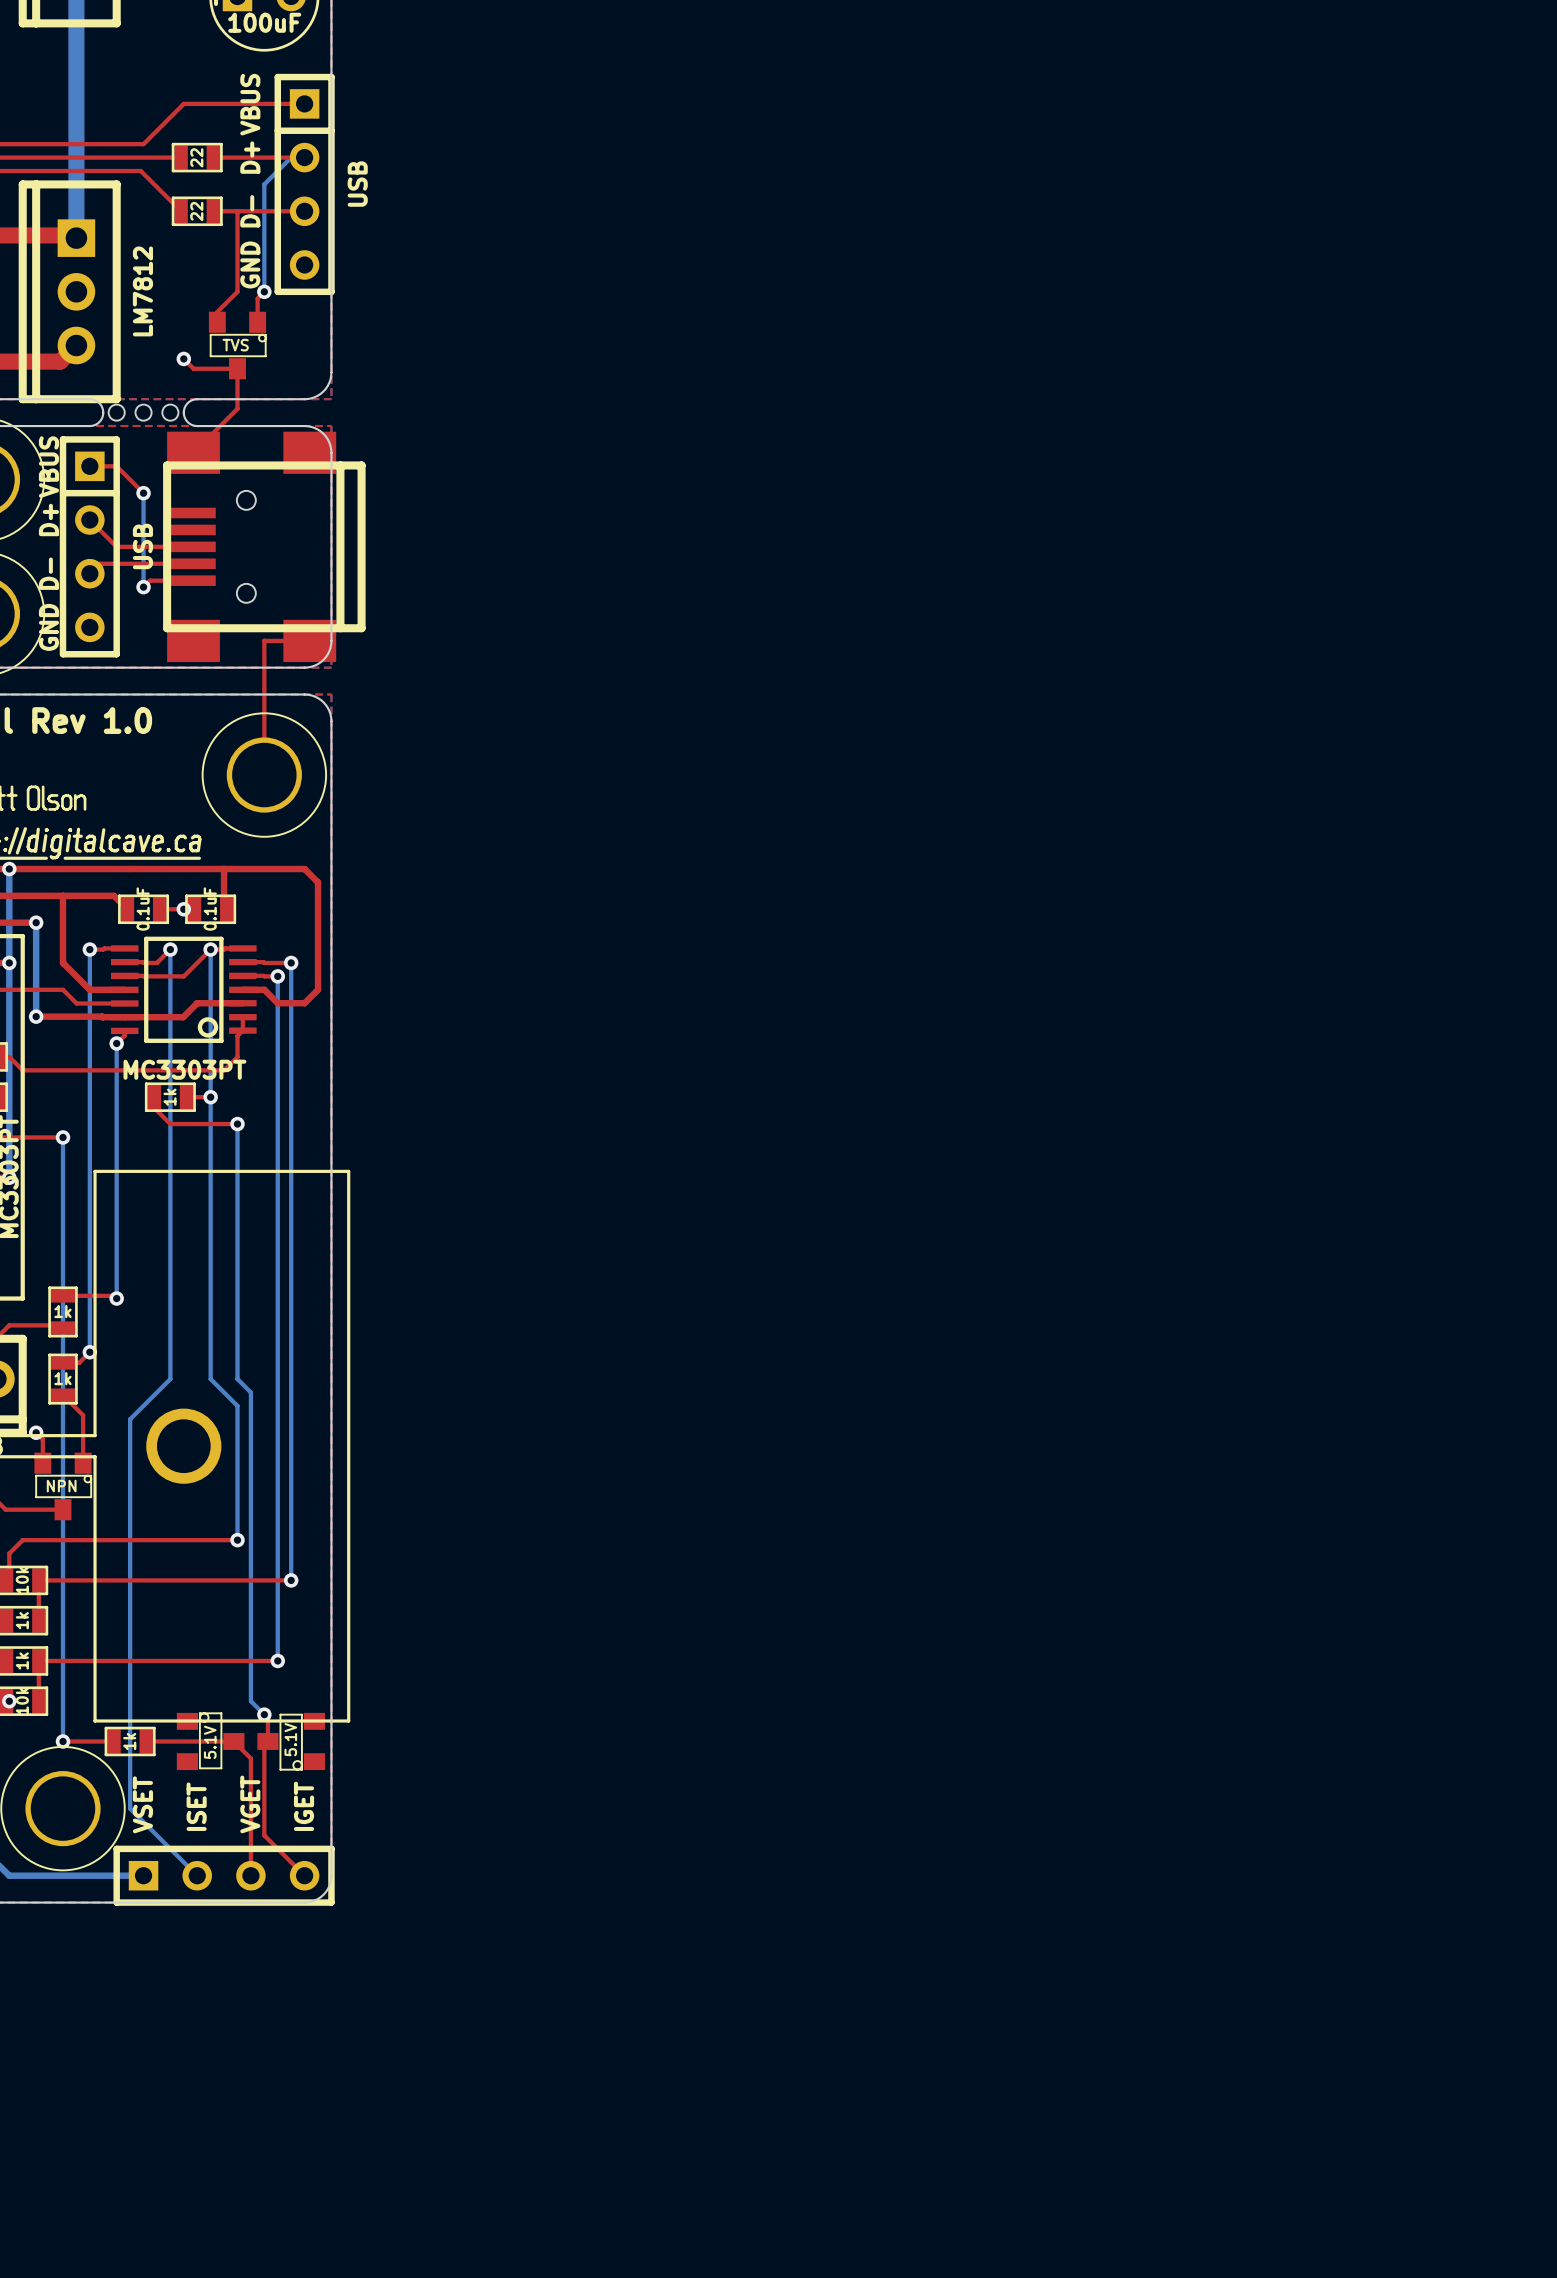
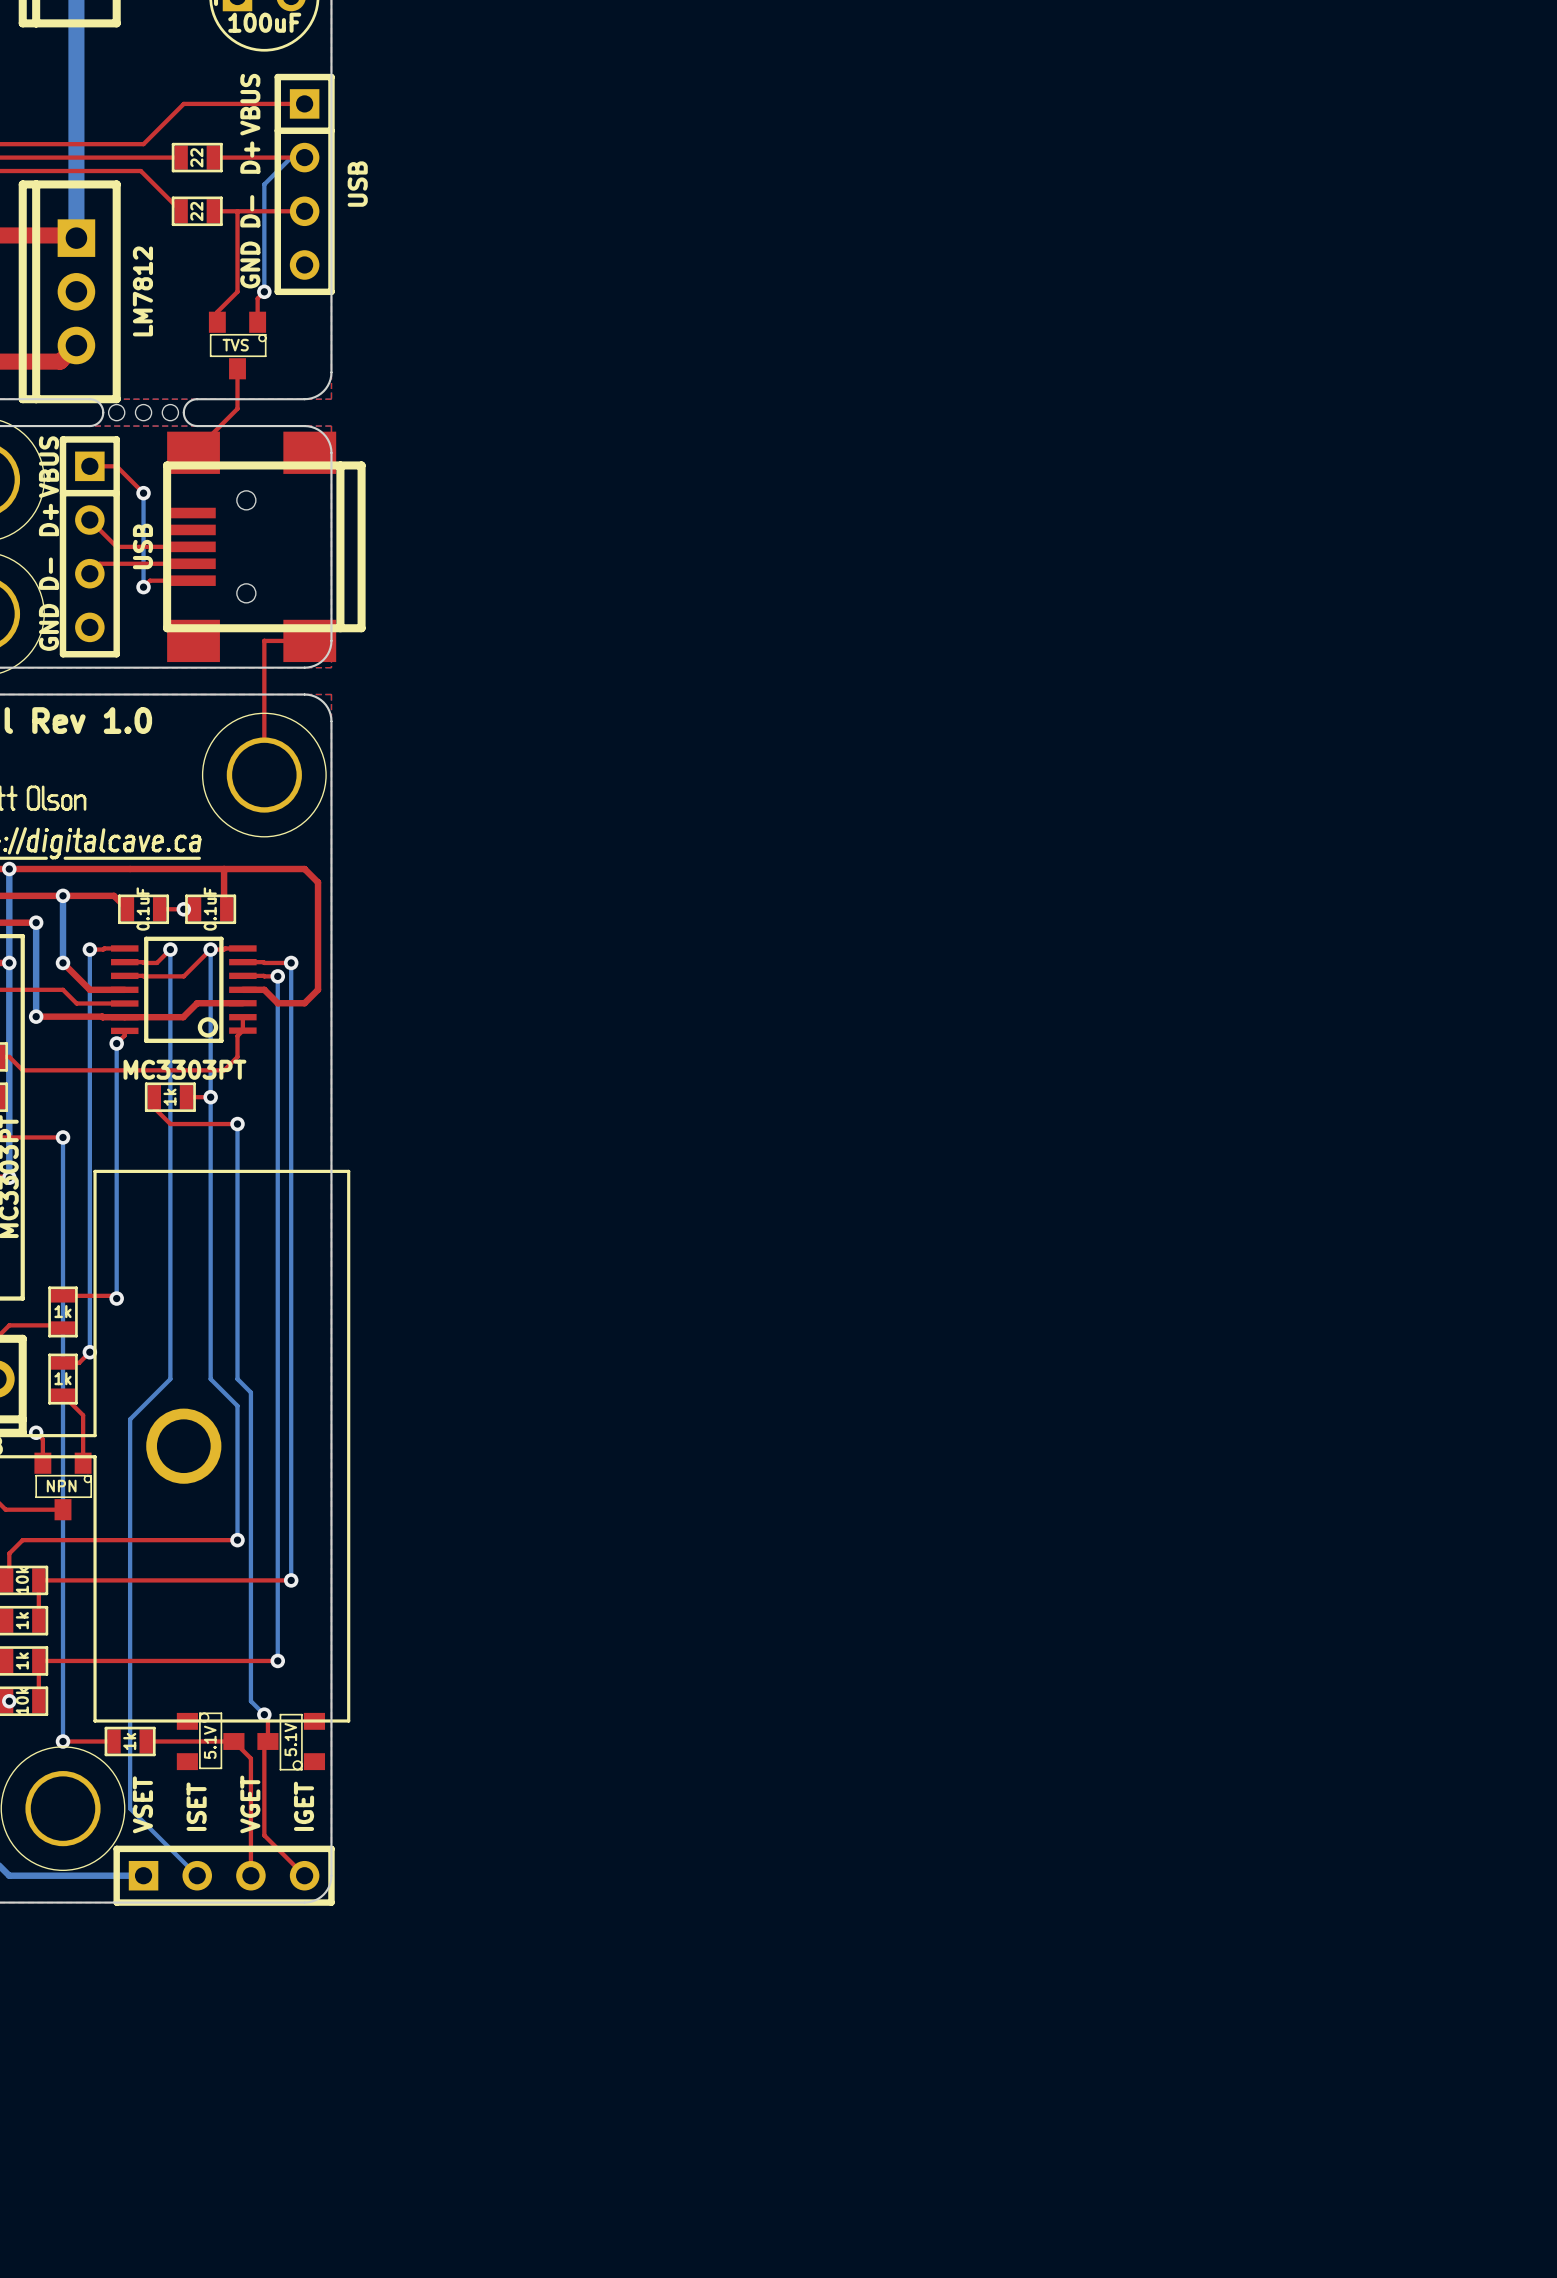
top track: (183, 358) (193, 368) (237, 368) -> none
via: (183, 358) -> none
top track: (63, 895) (63, 962) -> none
bottom track: none -> (63, 895) (63, 962)
via: none -> (63, 895)
via: none -> (63, 962)

